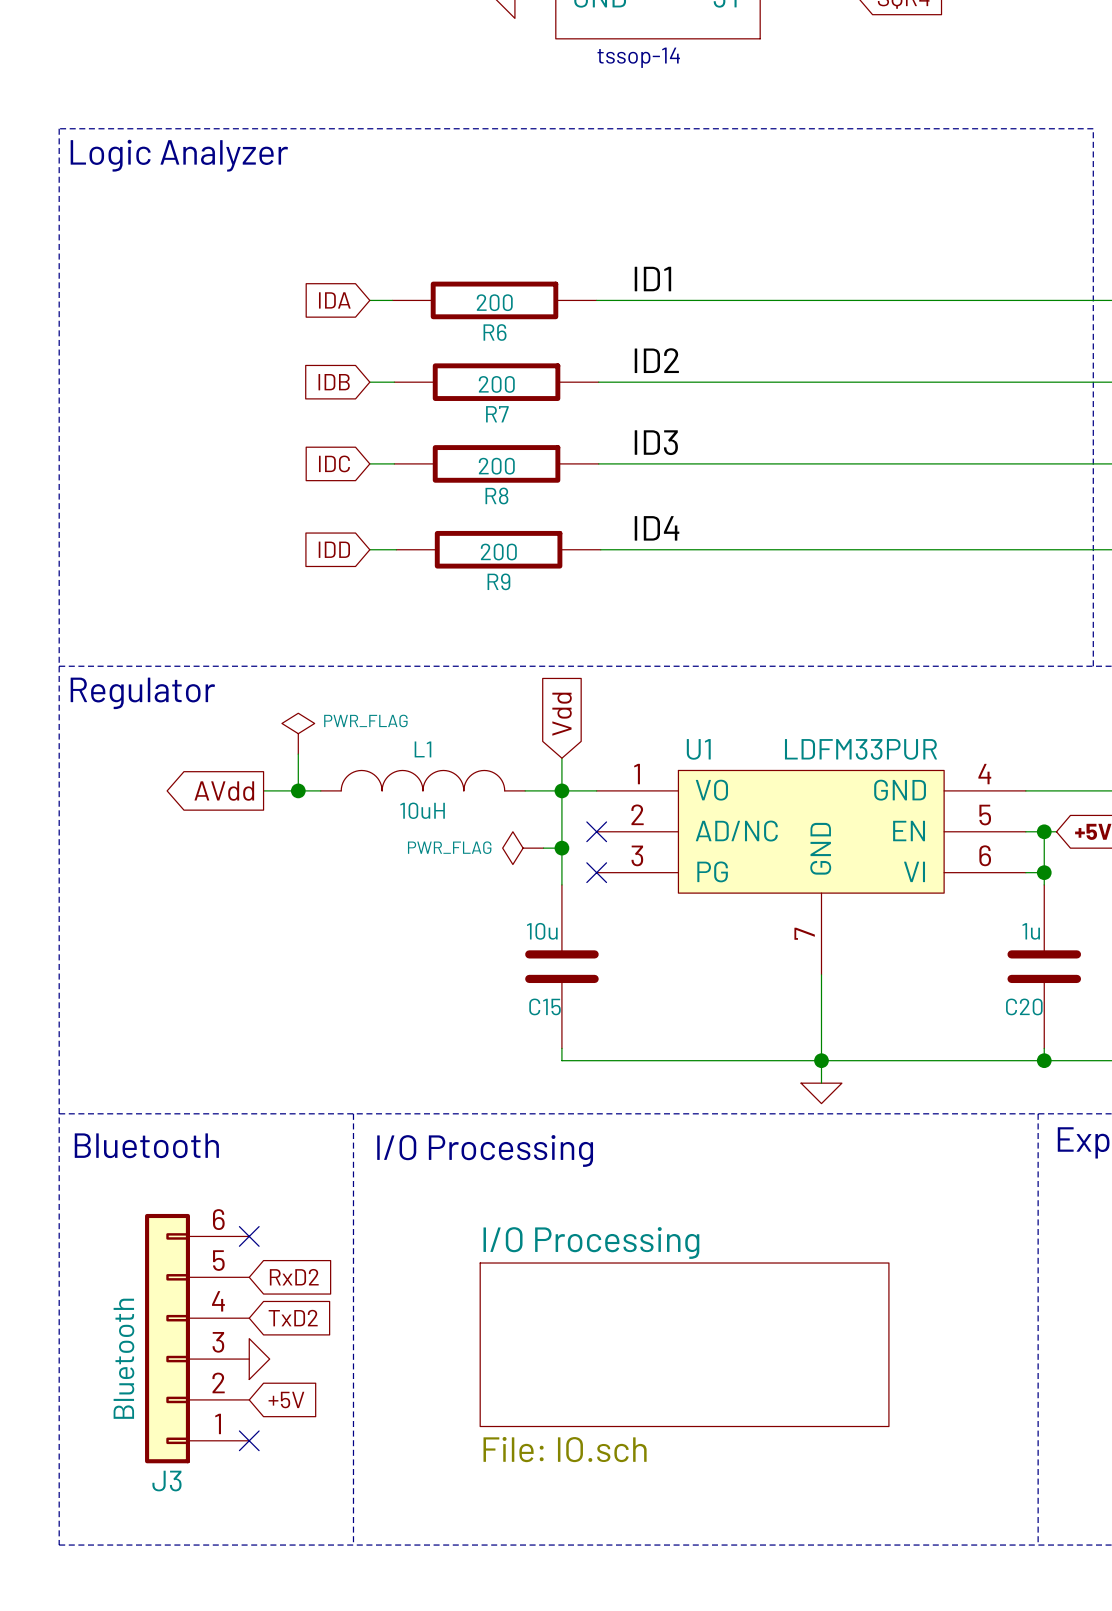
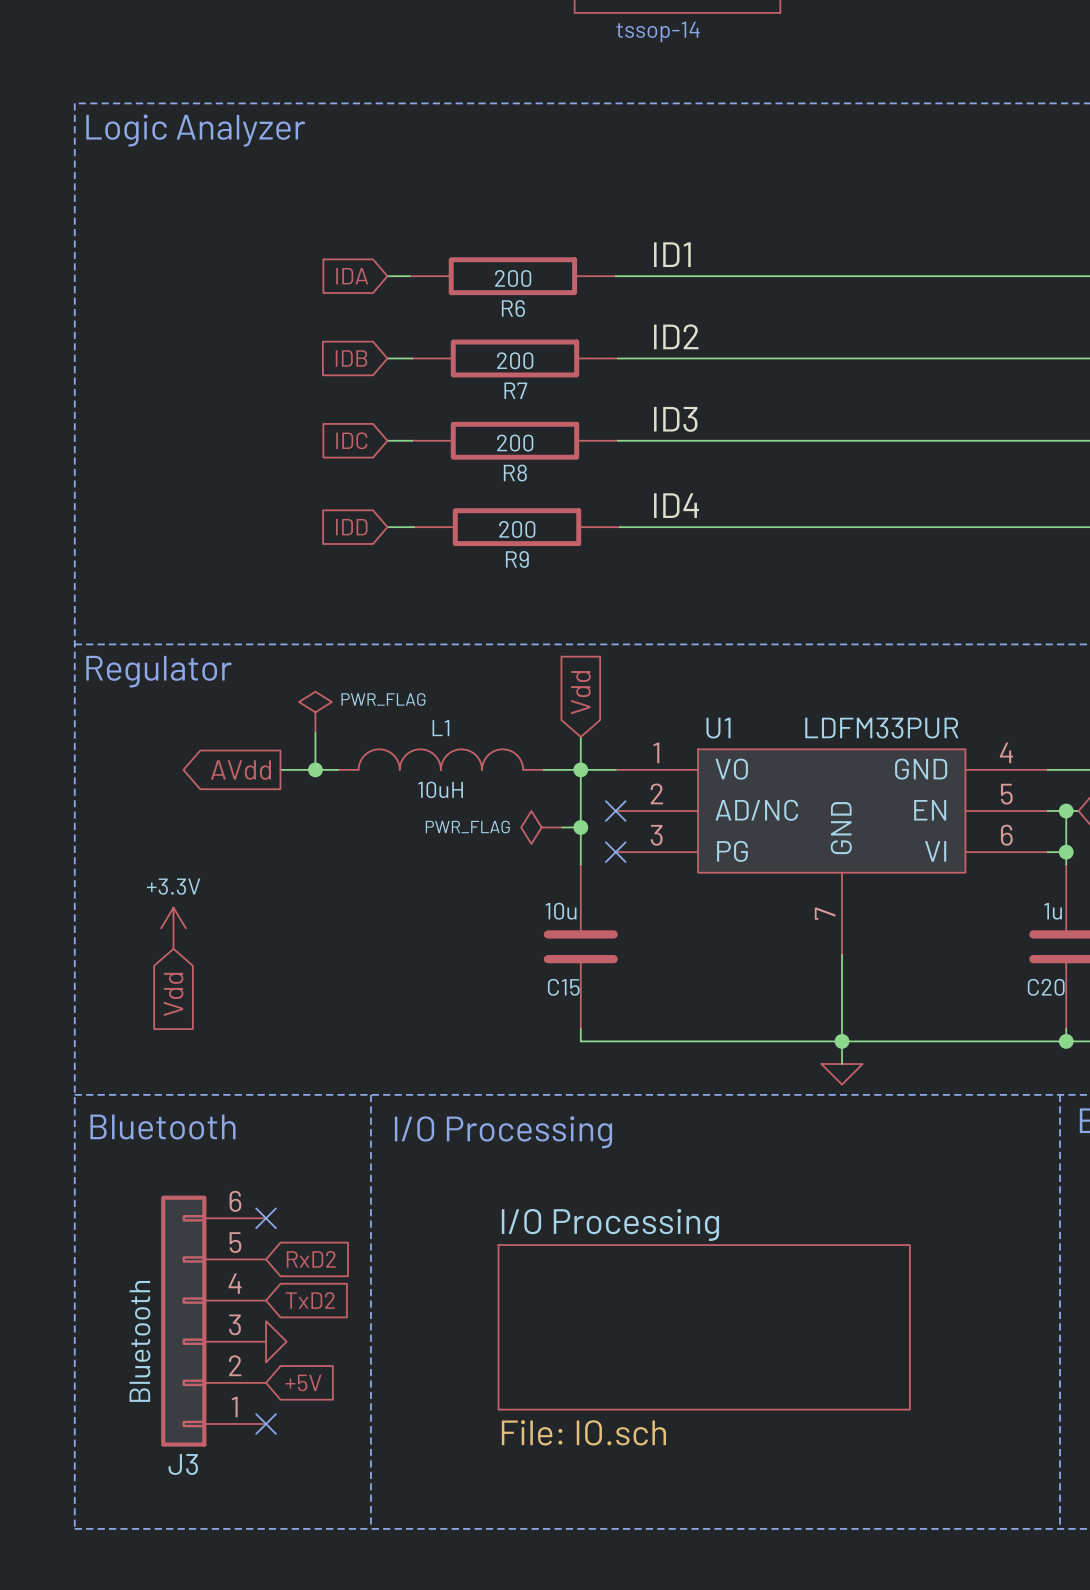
power symbol: none -> +3.3V (173, 928)
global label: none -> Vdd (173, 994)

